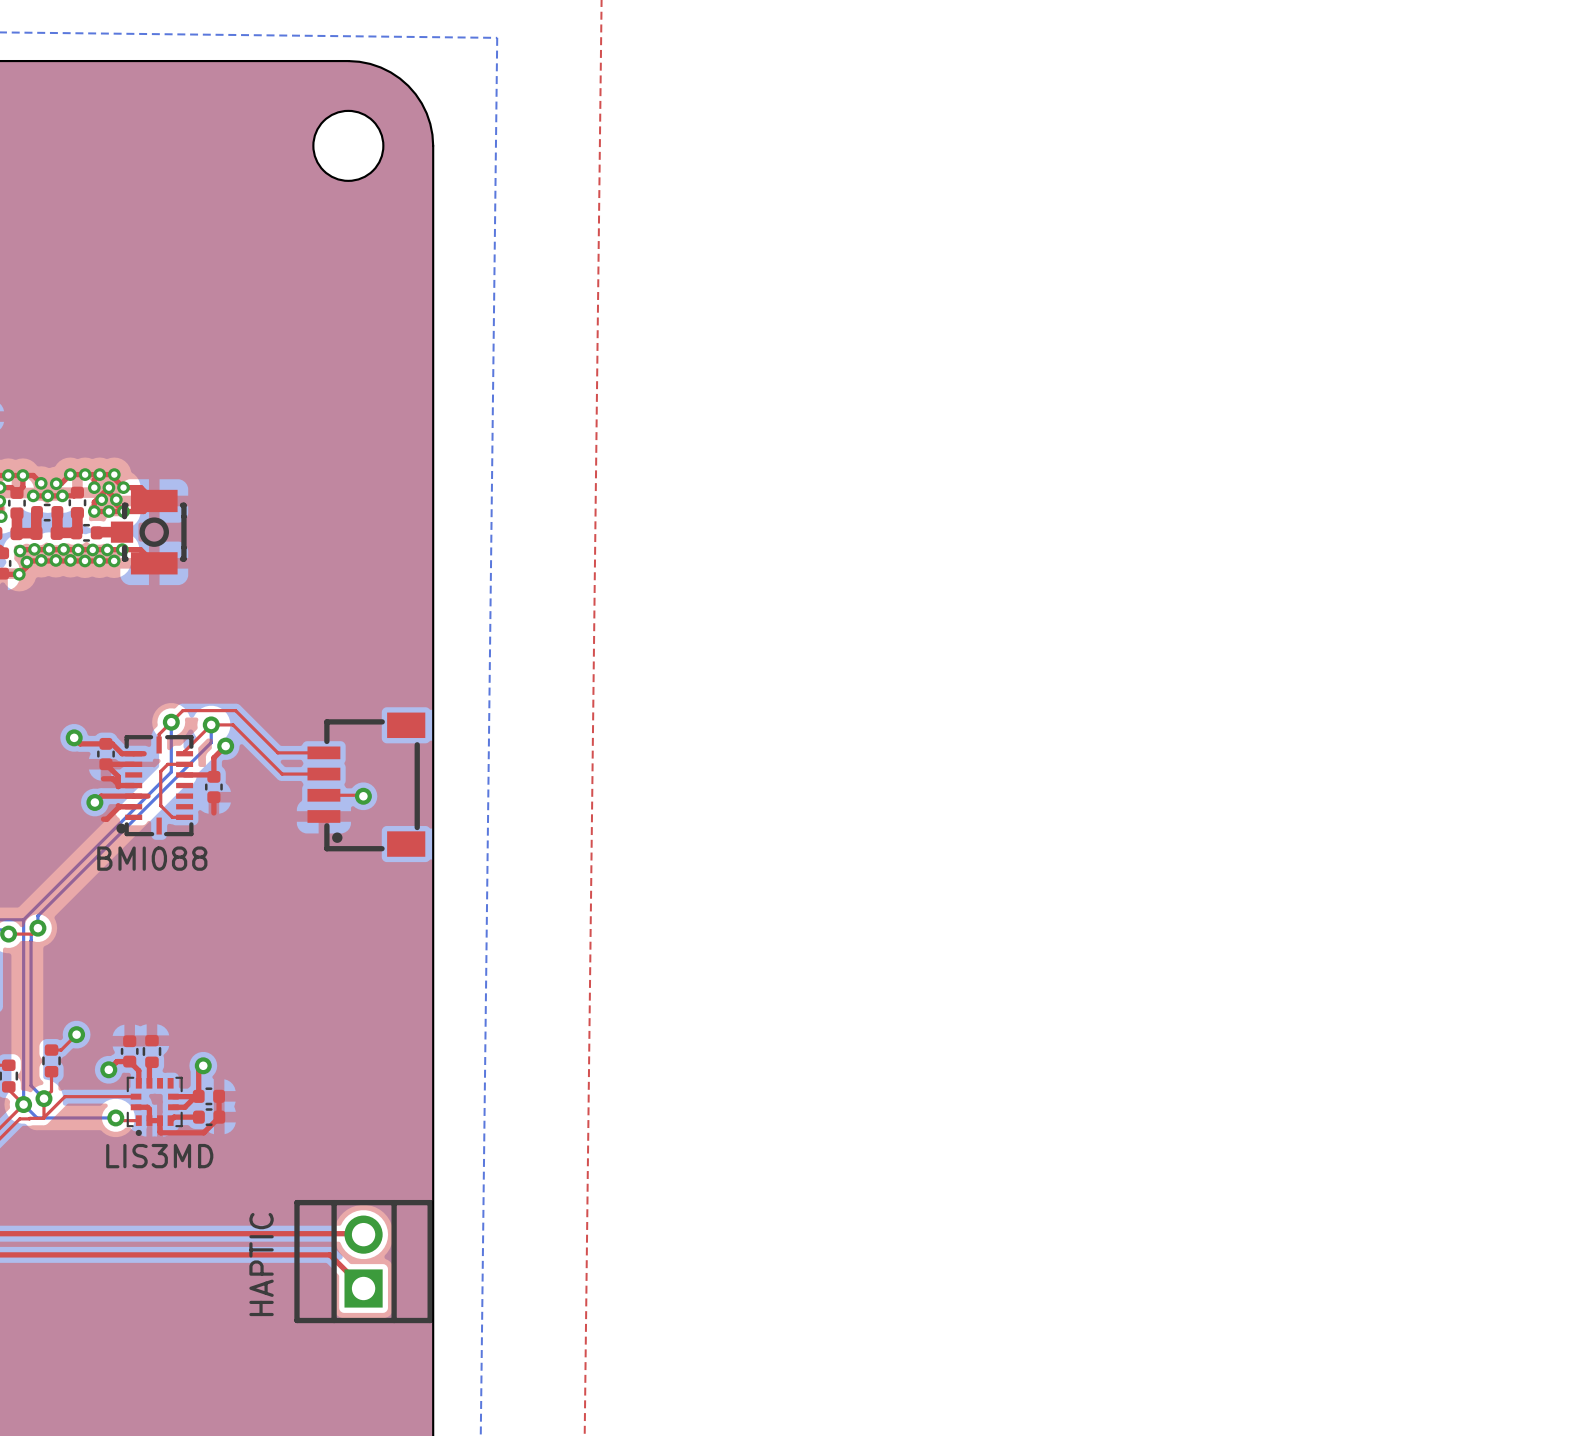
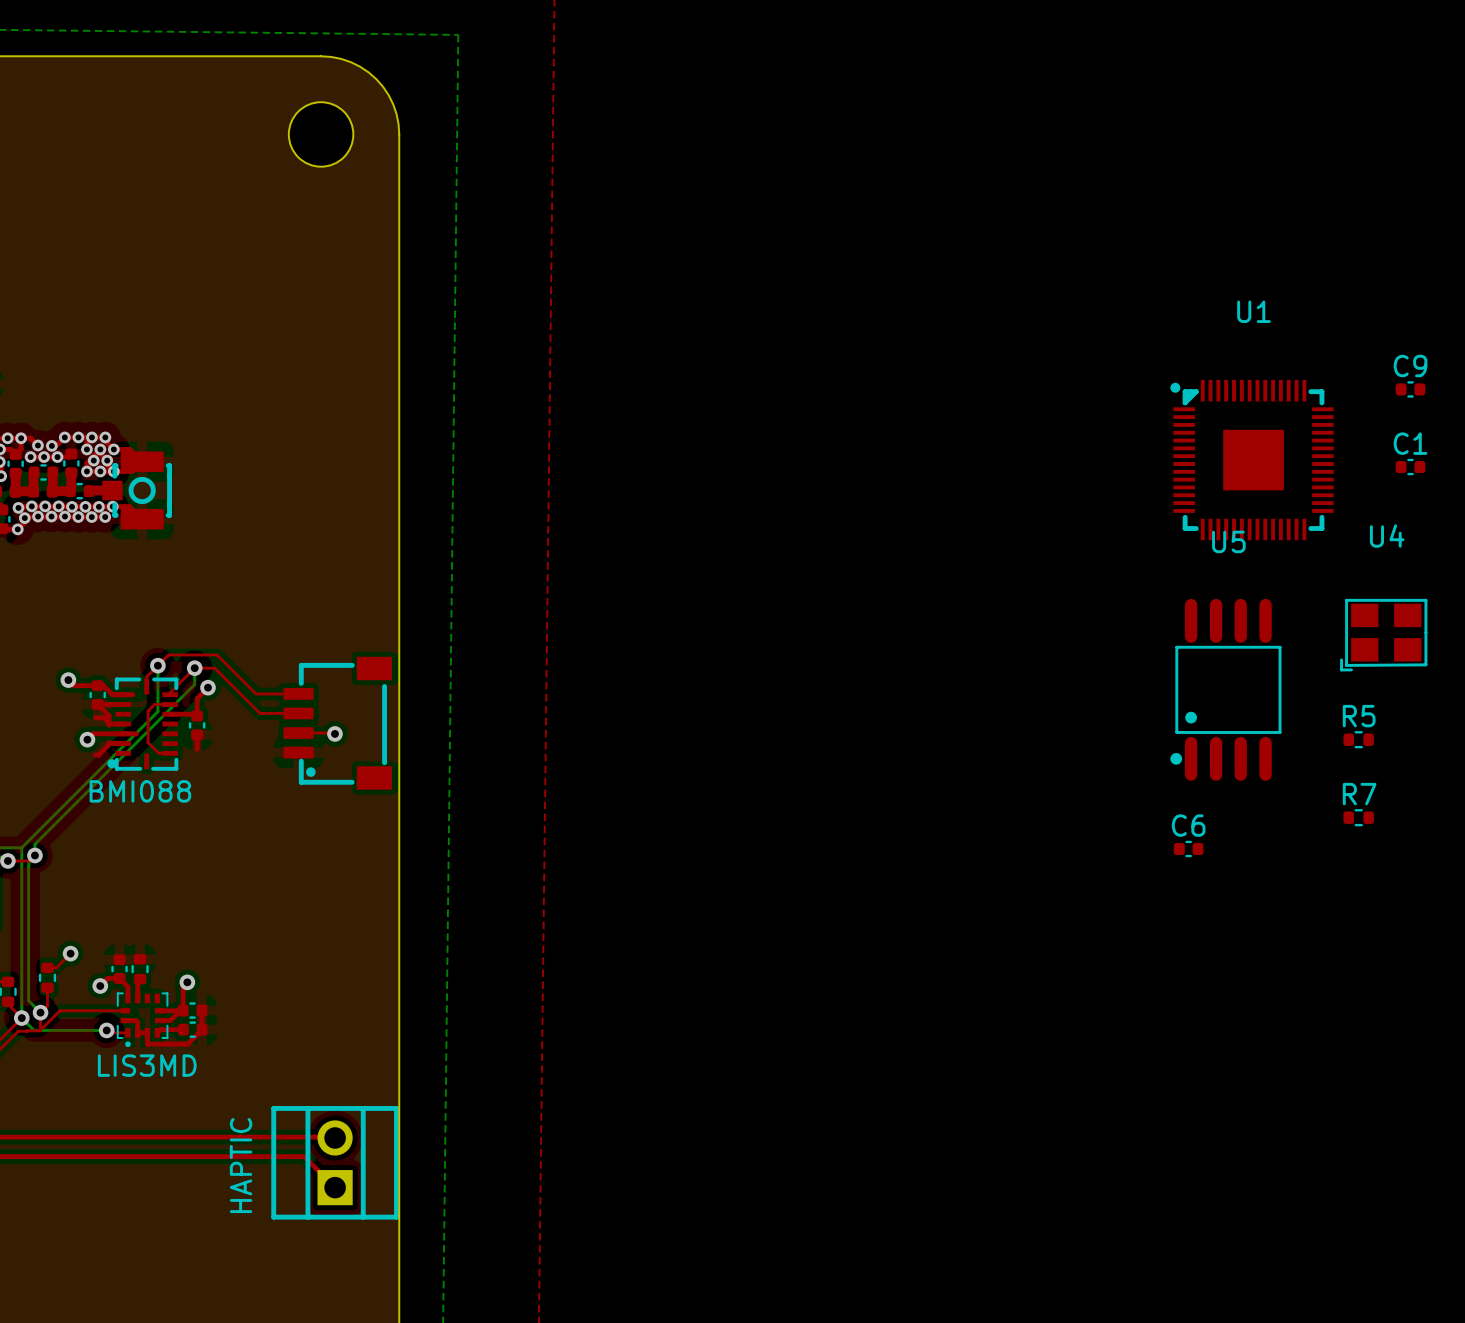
C9: none -> (1410, 389)
U1: none -> (1252, 460)
C1: none -> (1410, 467)
U4: none -> (1383, 635)
U5: none -> (1225, 689)
R5: none -> (1358, 739)
R7: none -> (1358, 817)
C6: none -> (1188, 848)

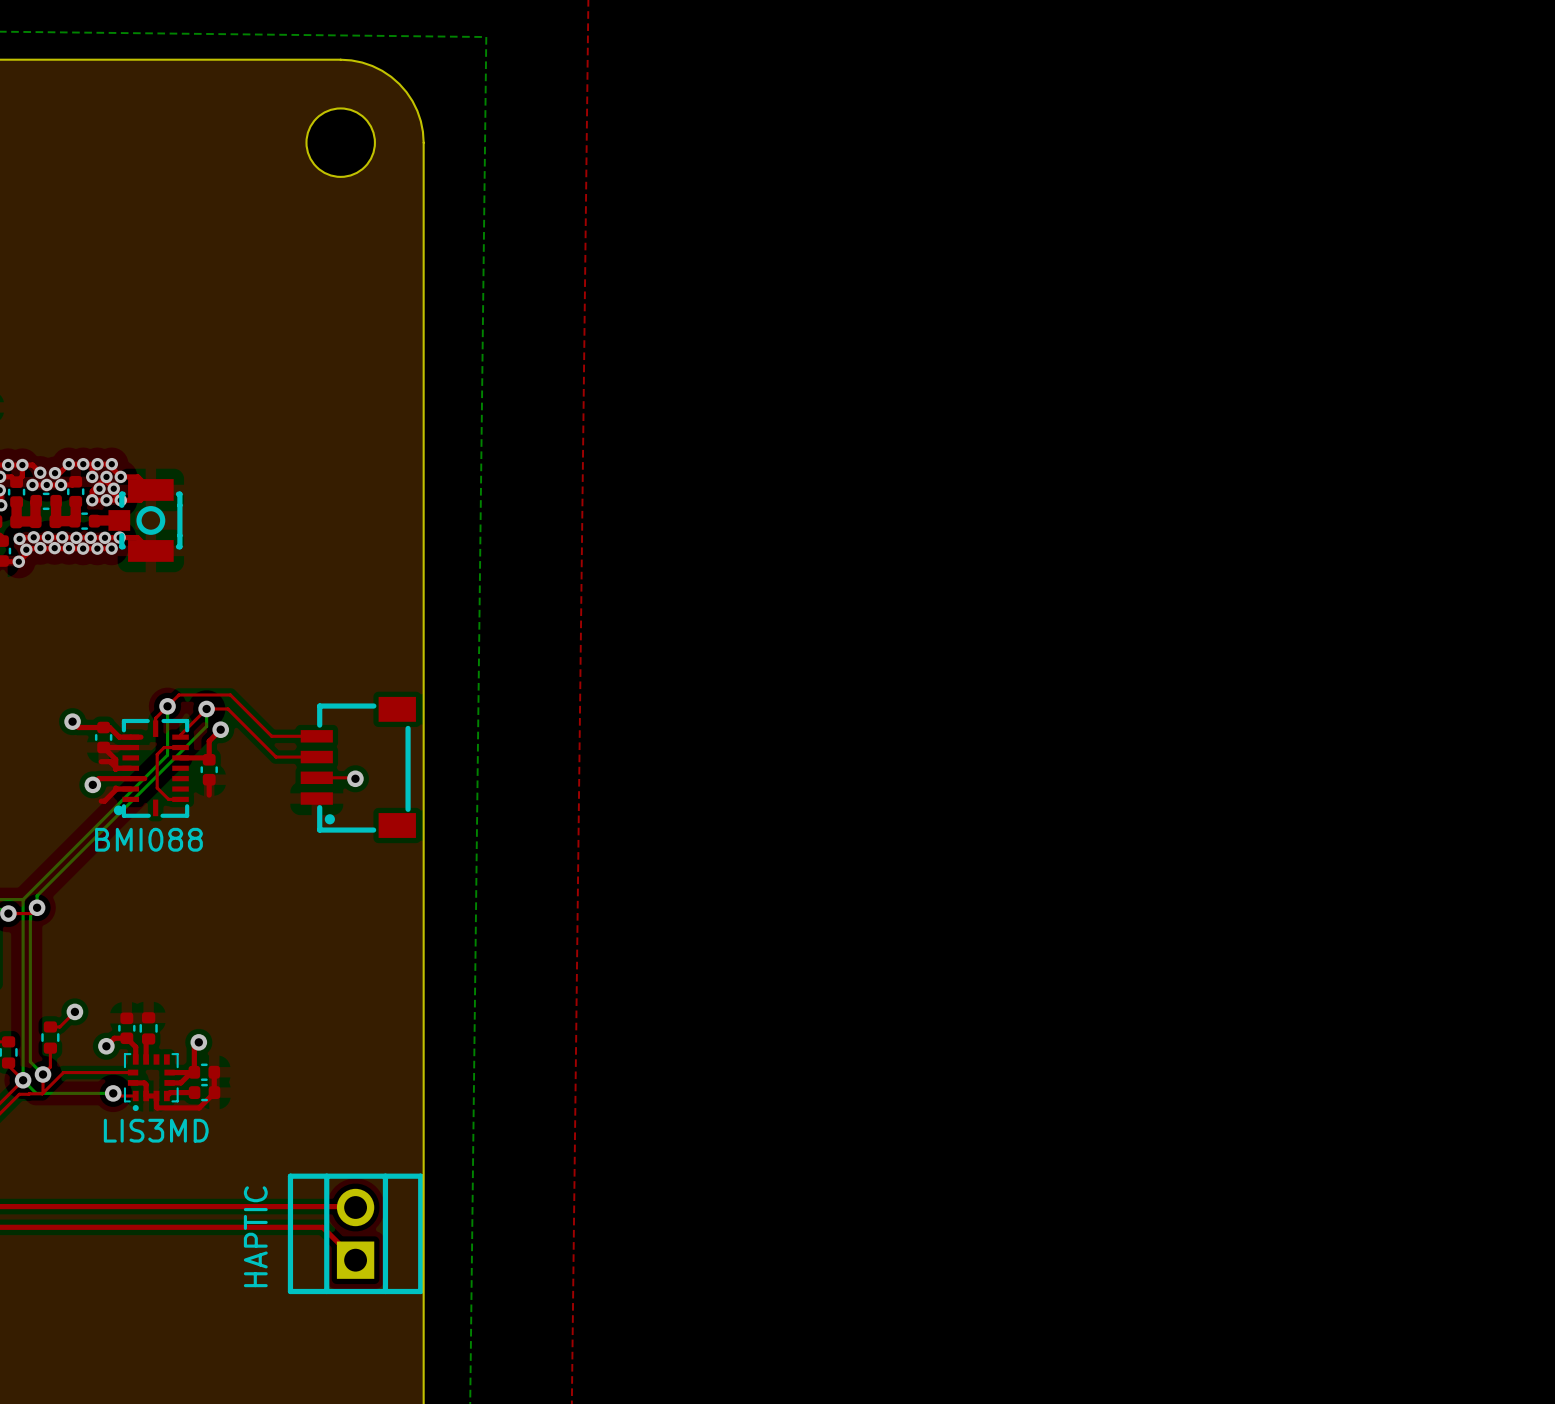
C9: (1410, 389) -> none
U1: (1252, 460) -> none
C1: (1410, 467) -> none
U4: (1383, 635) -> none
U5: (1225, 689) -> none
R5: (1358, 739) -> none
R7: (1358, 817) -> none
C6: (1188, 848) -> none

